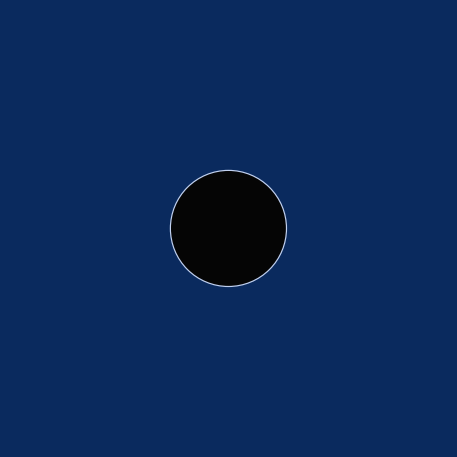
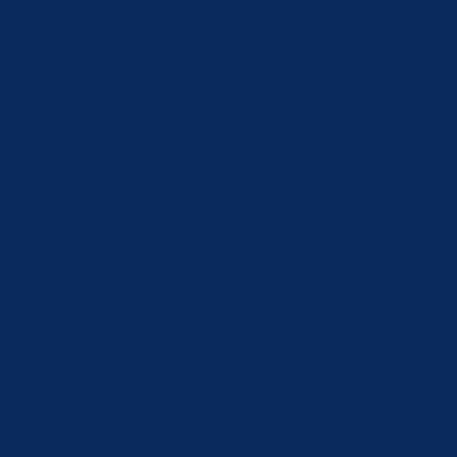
part: (228, 228) -> none

